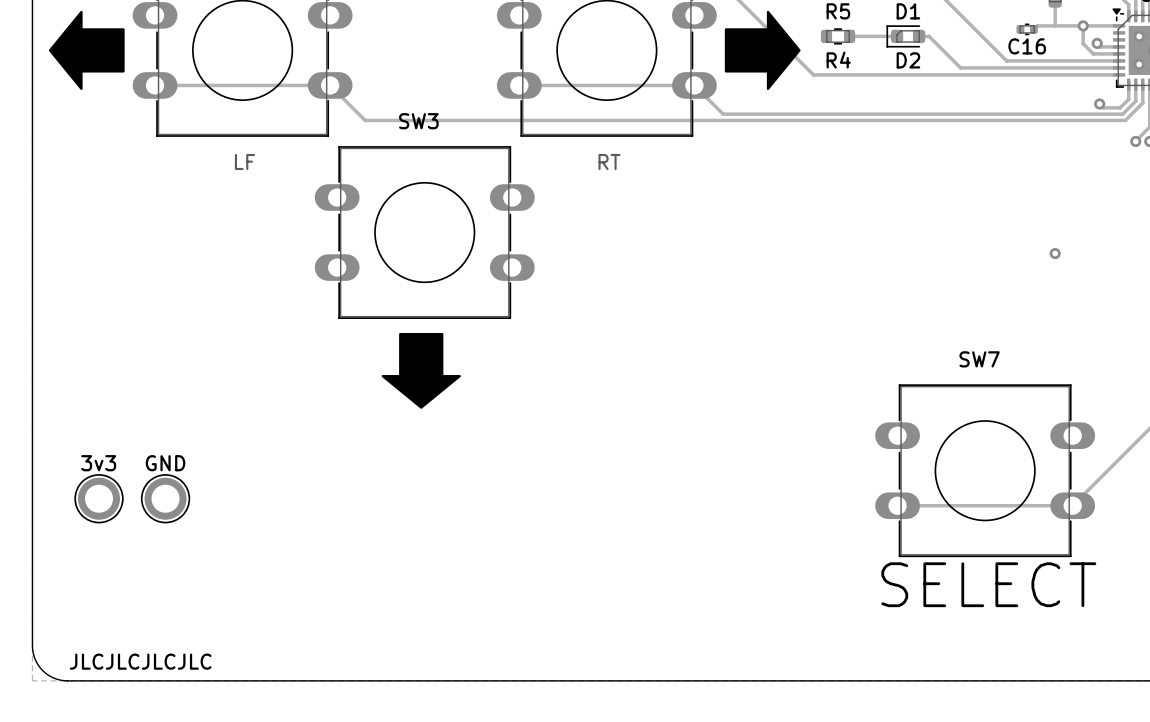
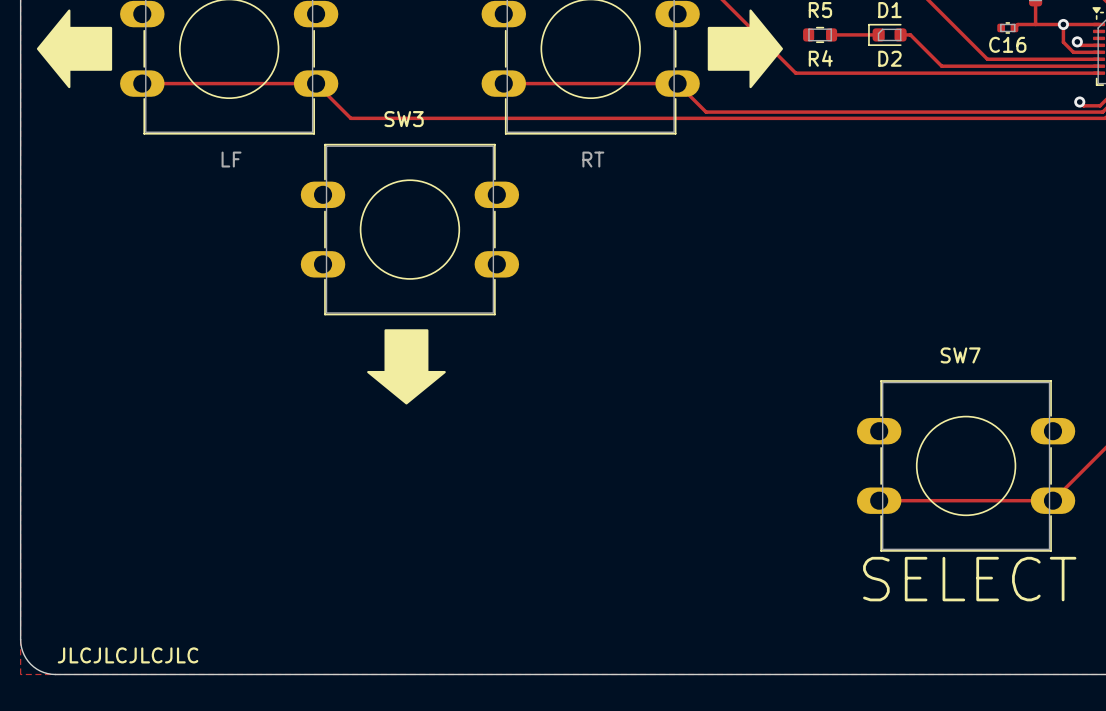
via: (1055, 253) -> none
3v3: (99, 498) -> none
GND: (165, 498) -> none

